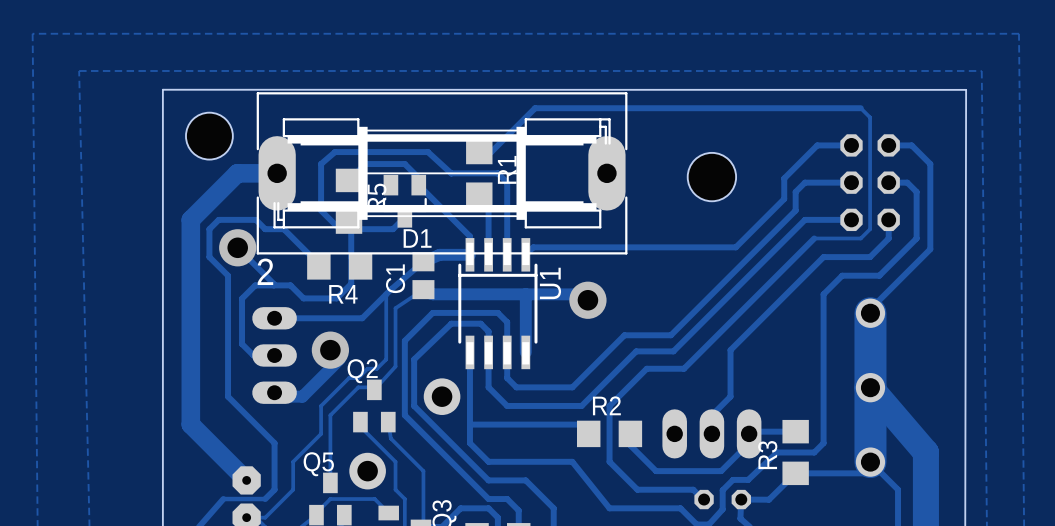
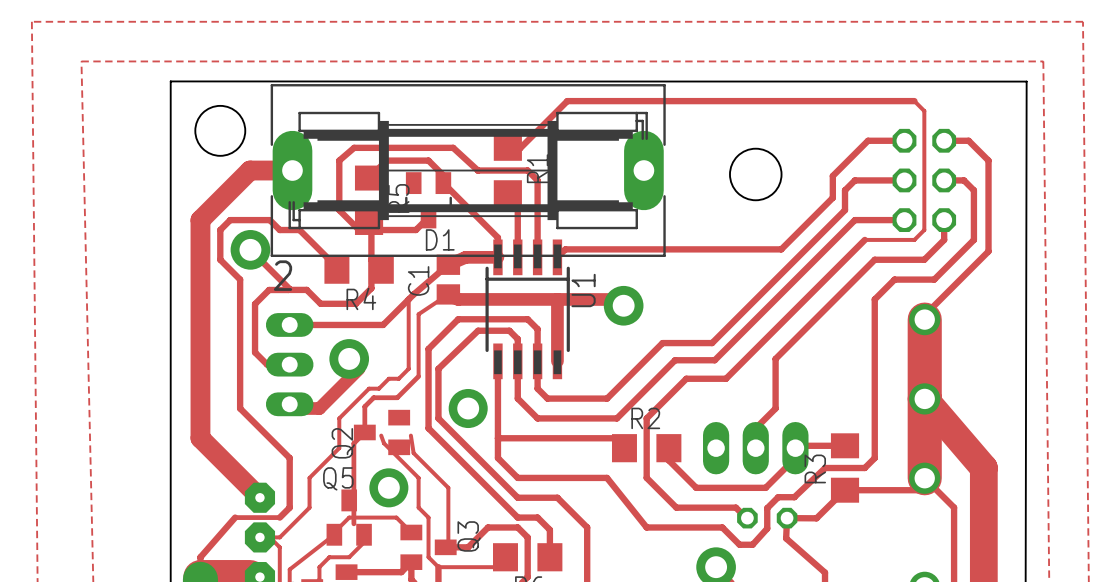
track: (395, 366) (374, 389) (374, 387) (358, 387) (330, 415) (330, 482) -> (418, 376) (397, 397) (373, 397) (364, 406) (364, 432) (353, 443) (353, 523)
Q2 rotation: 0° (374, 405) -> 90° counterclockwise (382, 432)

